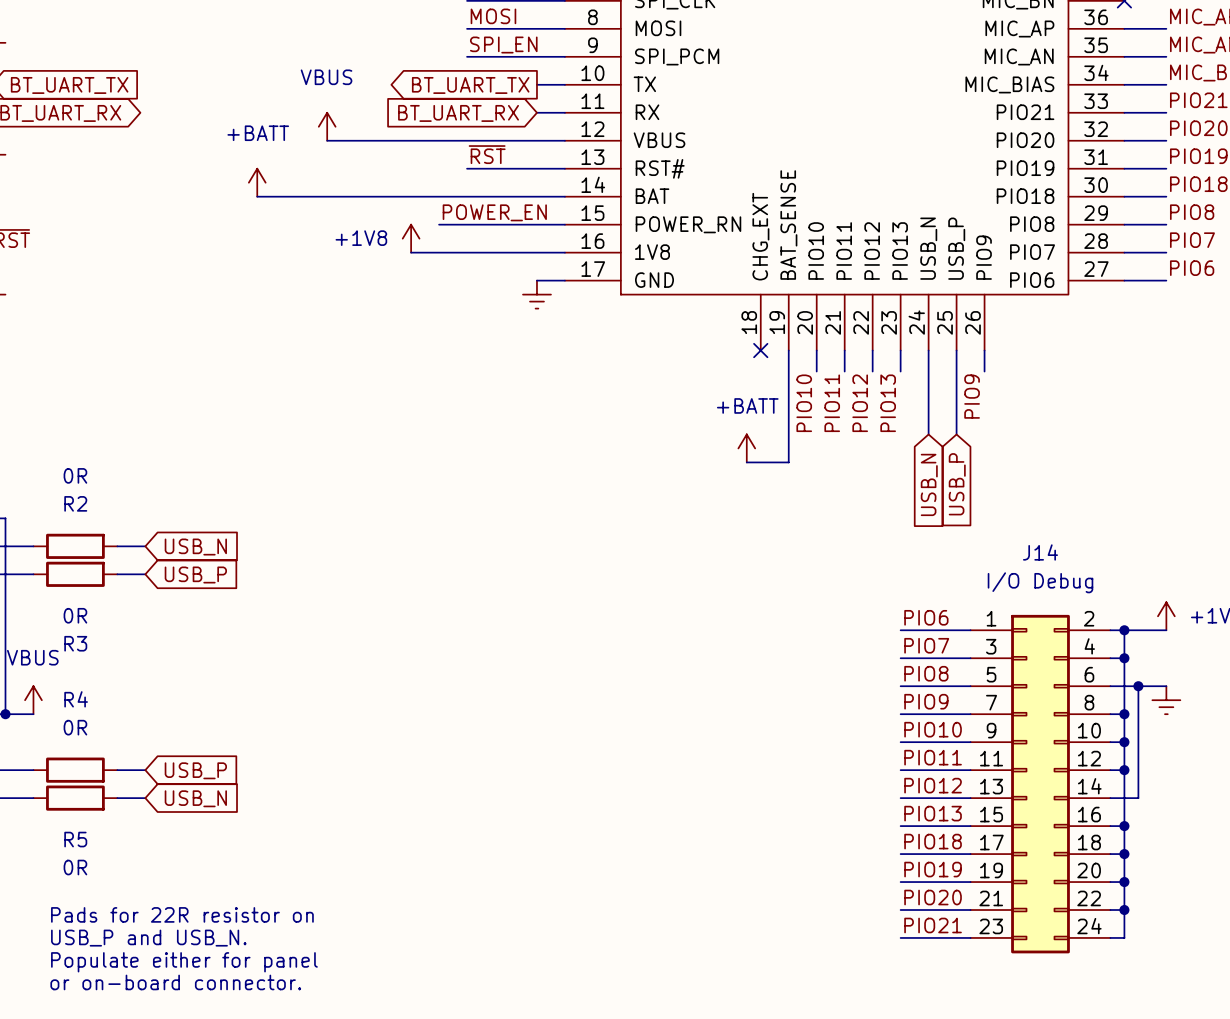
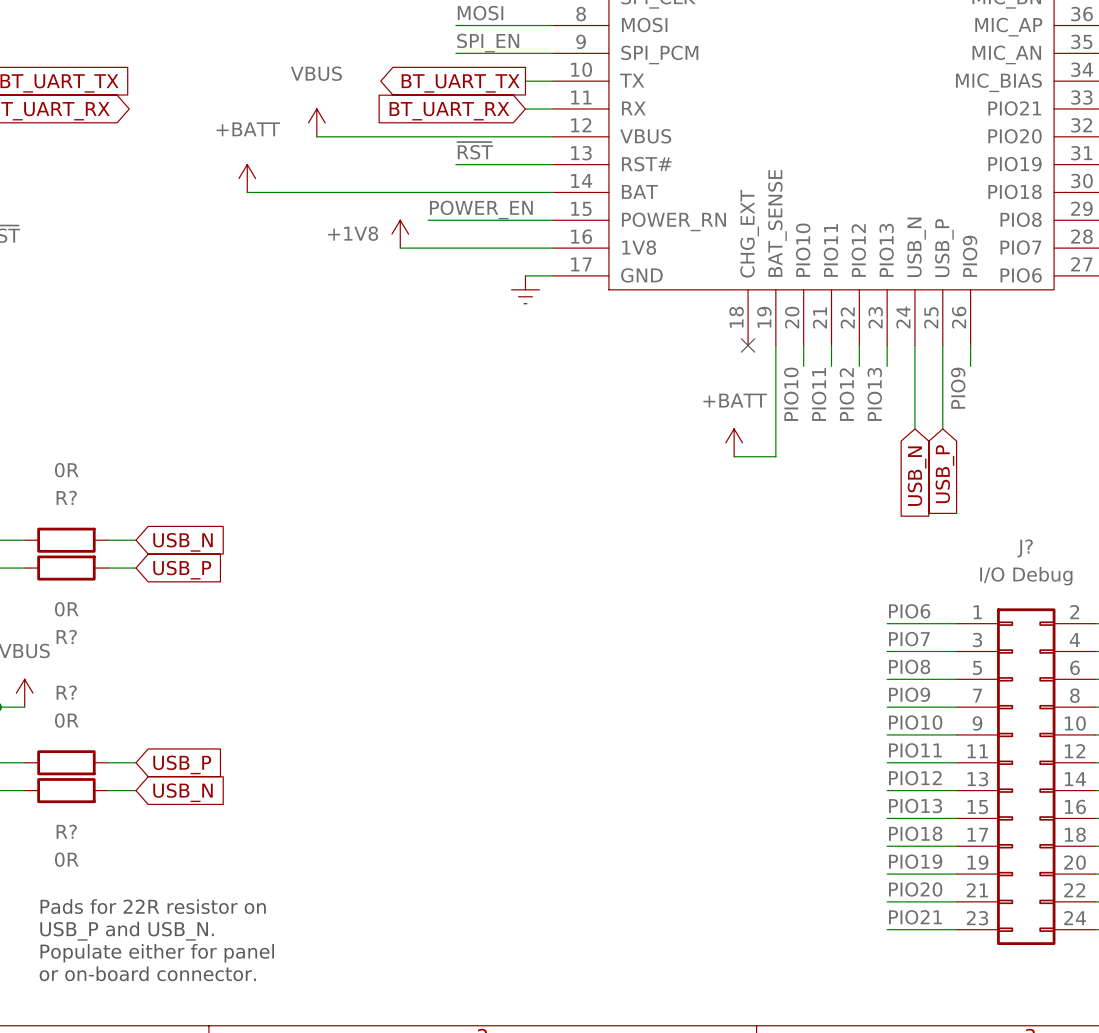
R2 name: R2 (75, 503) -> R? (66, 497)
J14 name: J14 (1040, 552) -> J? (1025, 548)
R3 name: R3 (75, 643) -> R? (66, 636)
R4 name: R4 (76, 699) -> R? (66, 692)
R5 name: R5 (75, 839) -> R? (66, 831)

